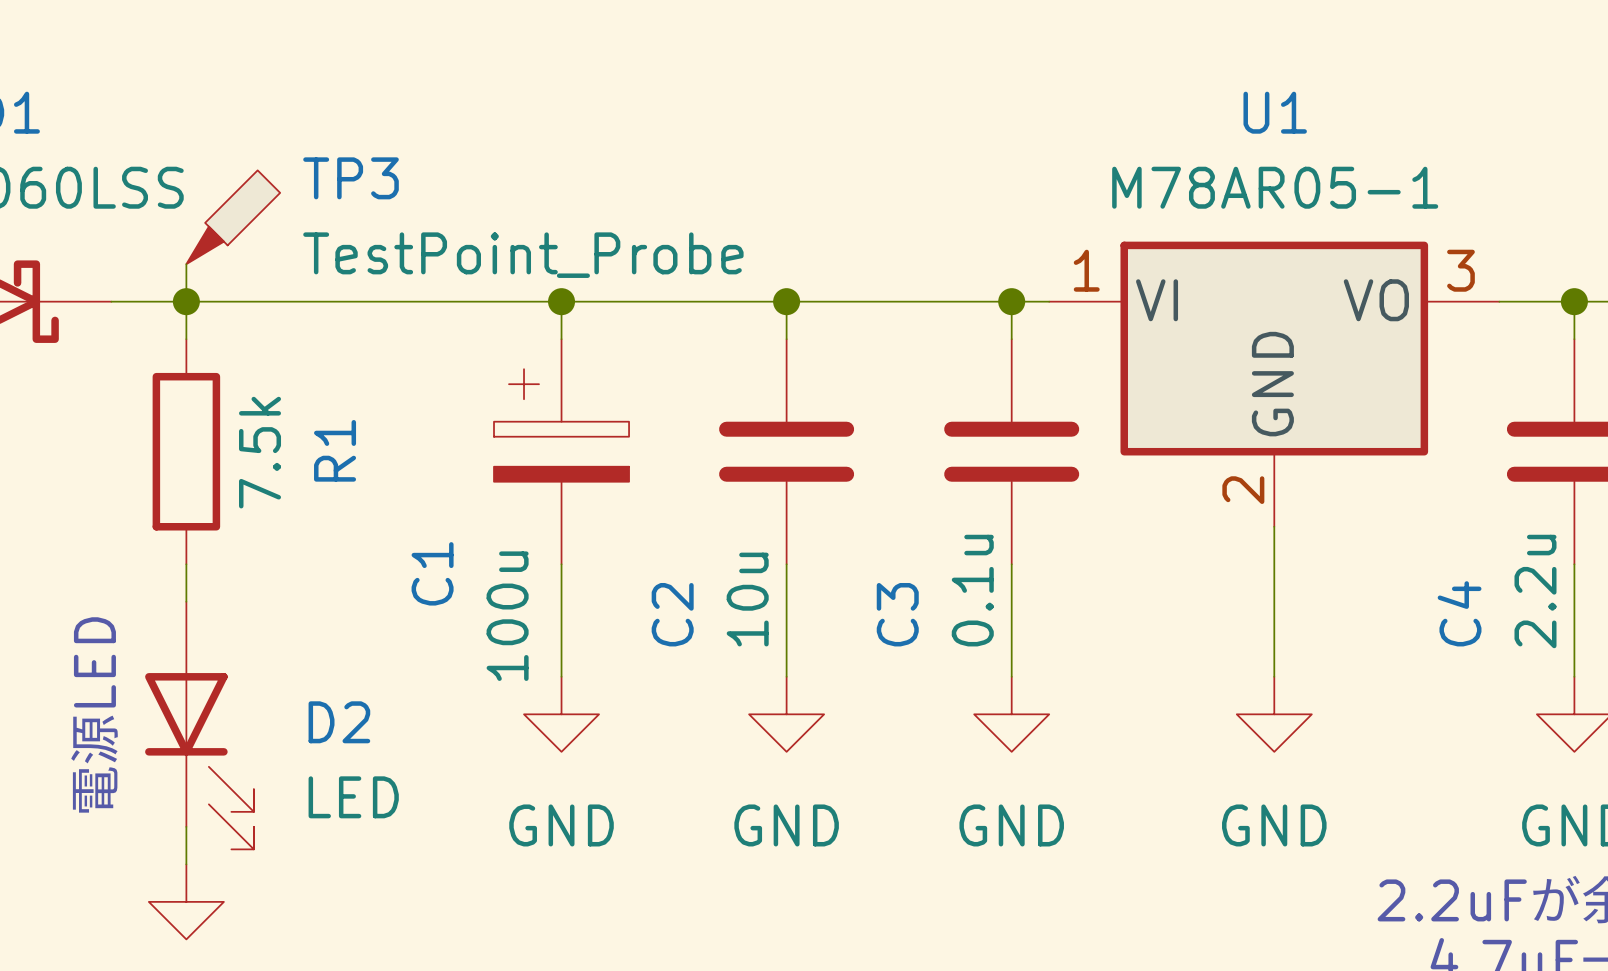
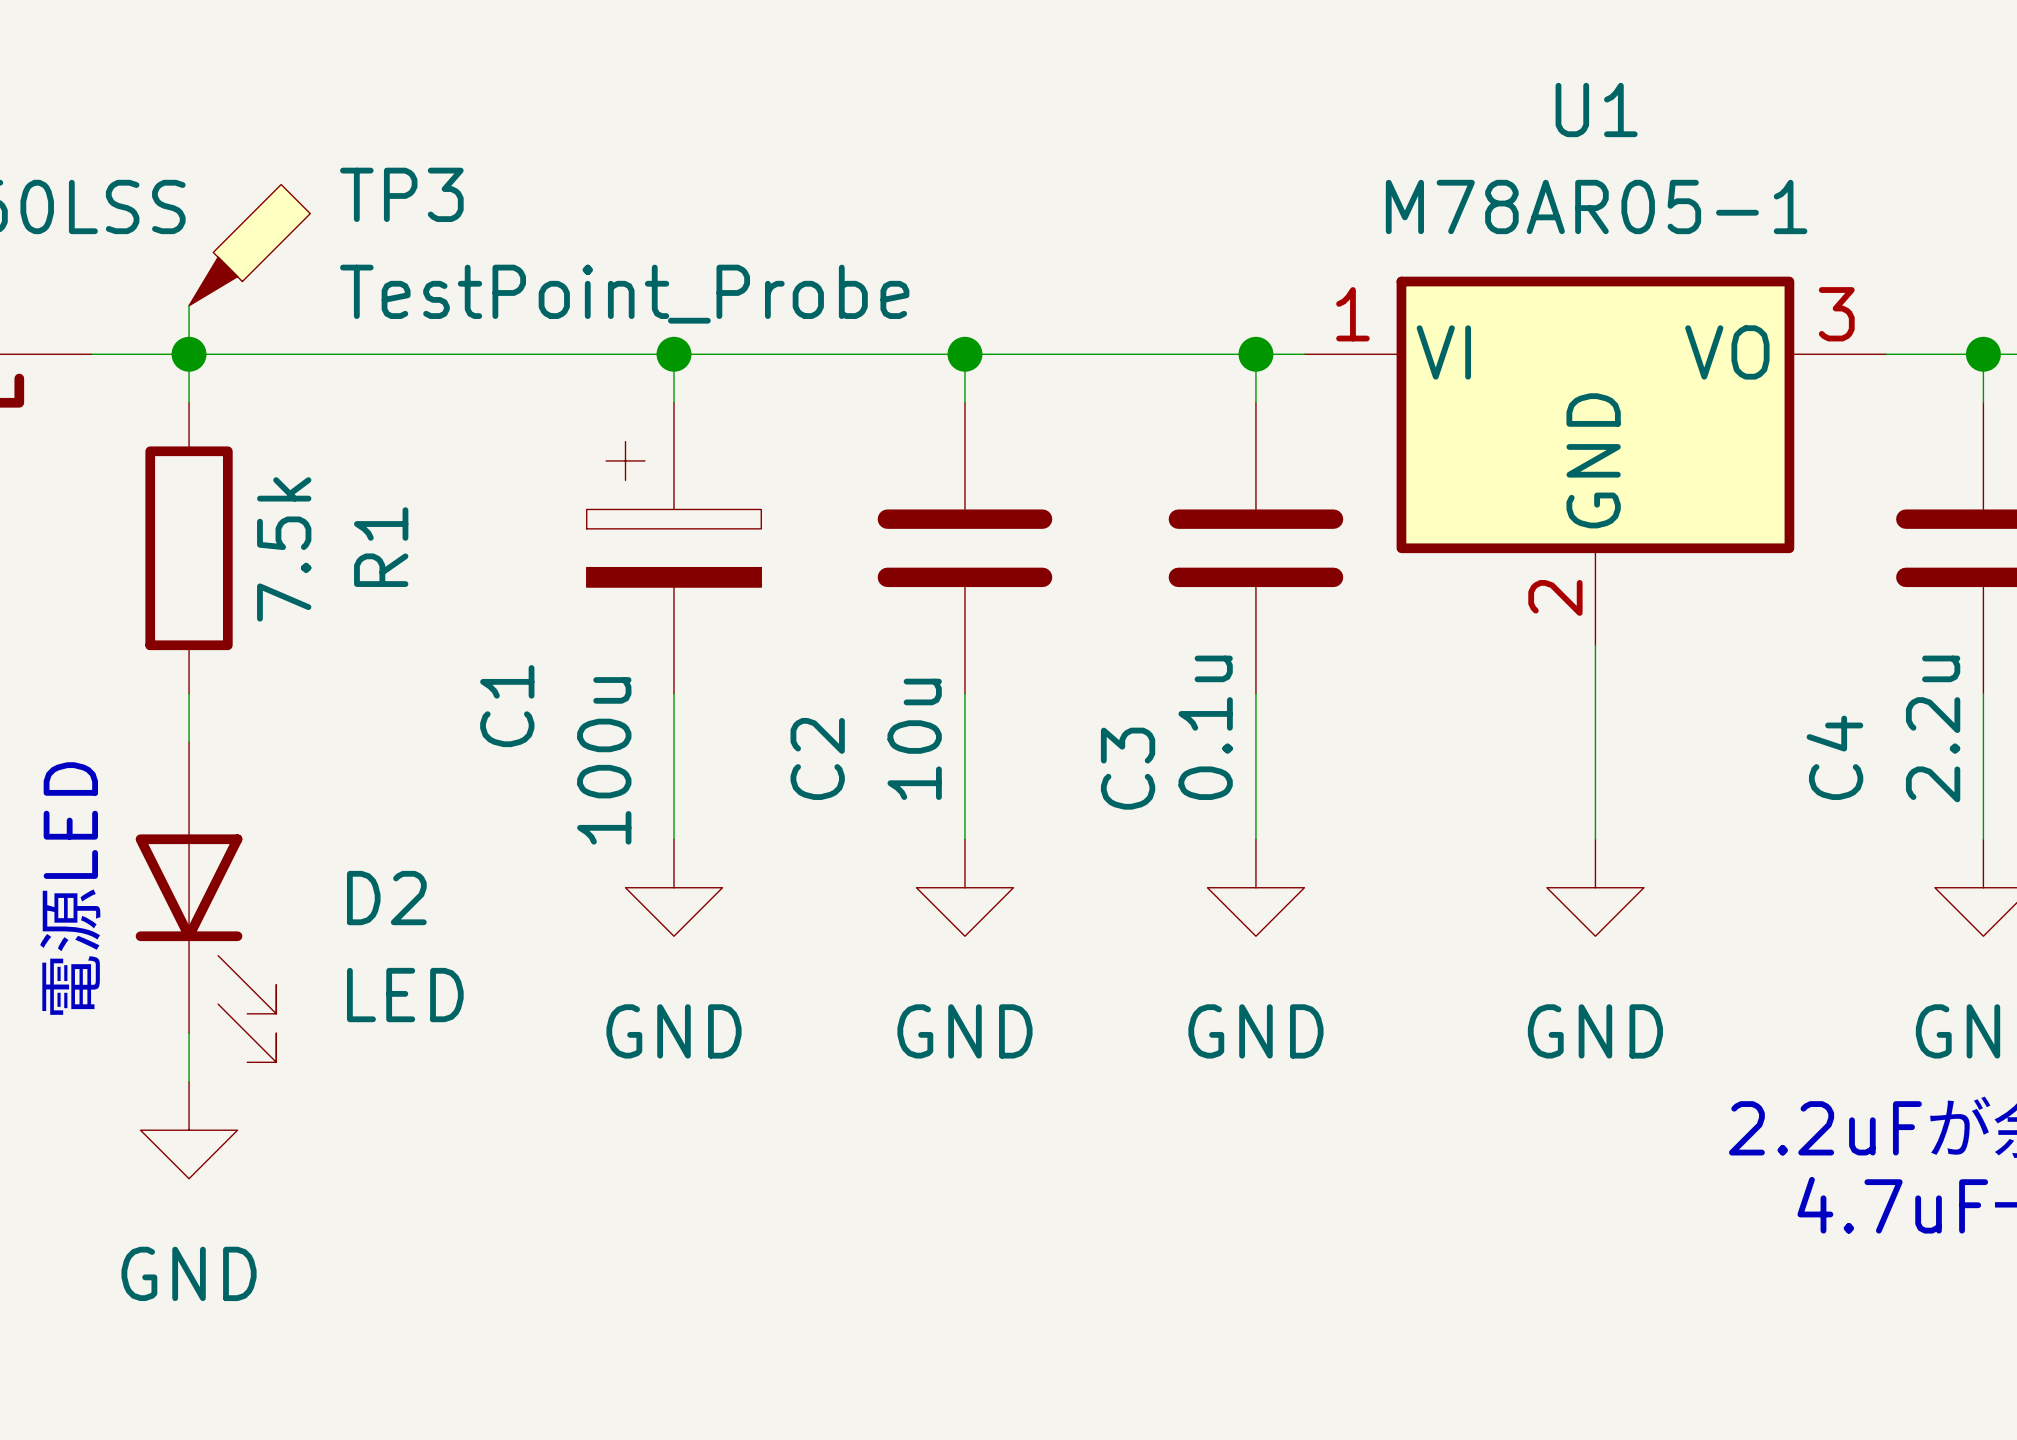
C3 name position: C3 (897, 614) -> C3 (1128, 768)

